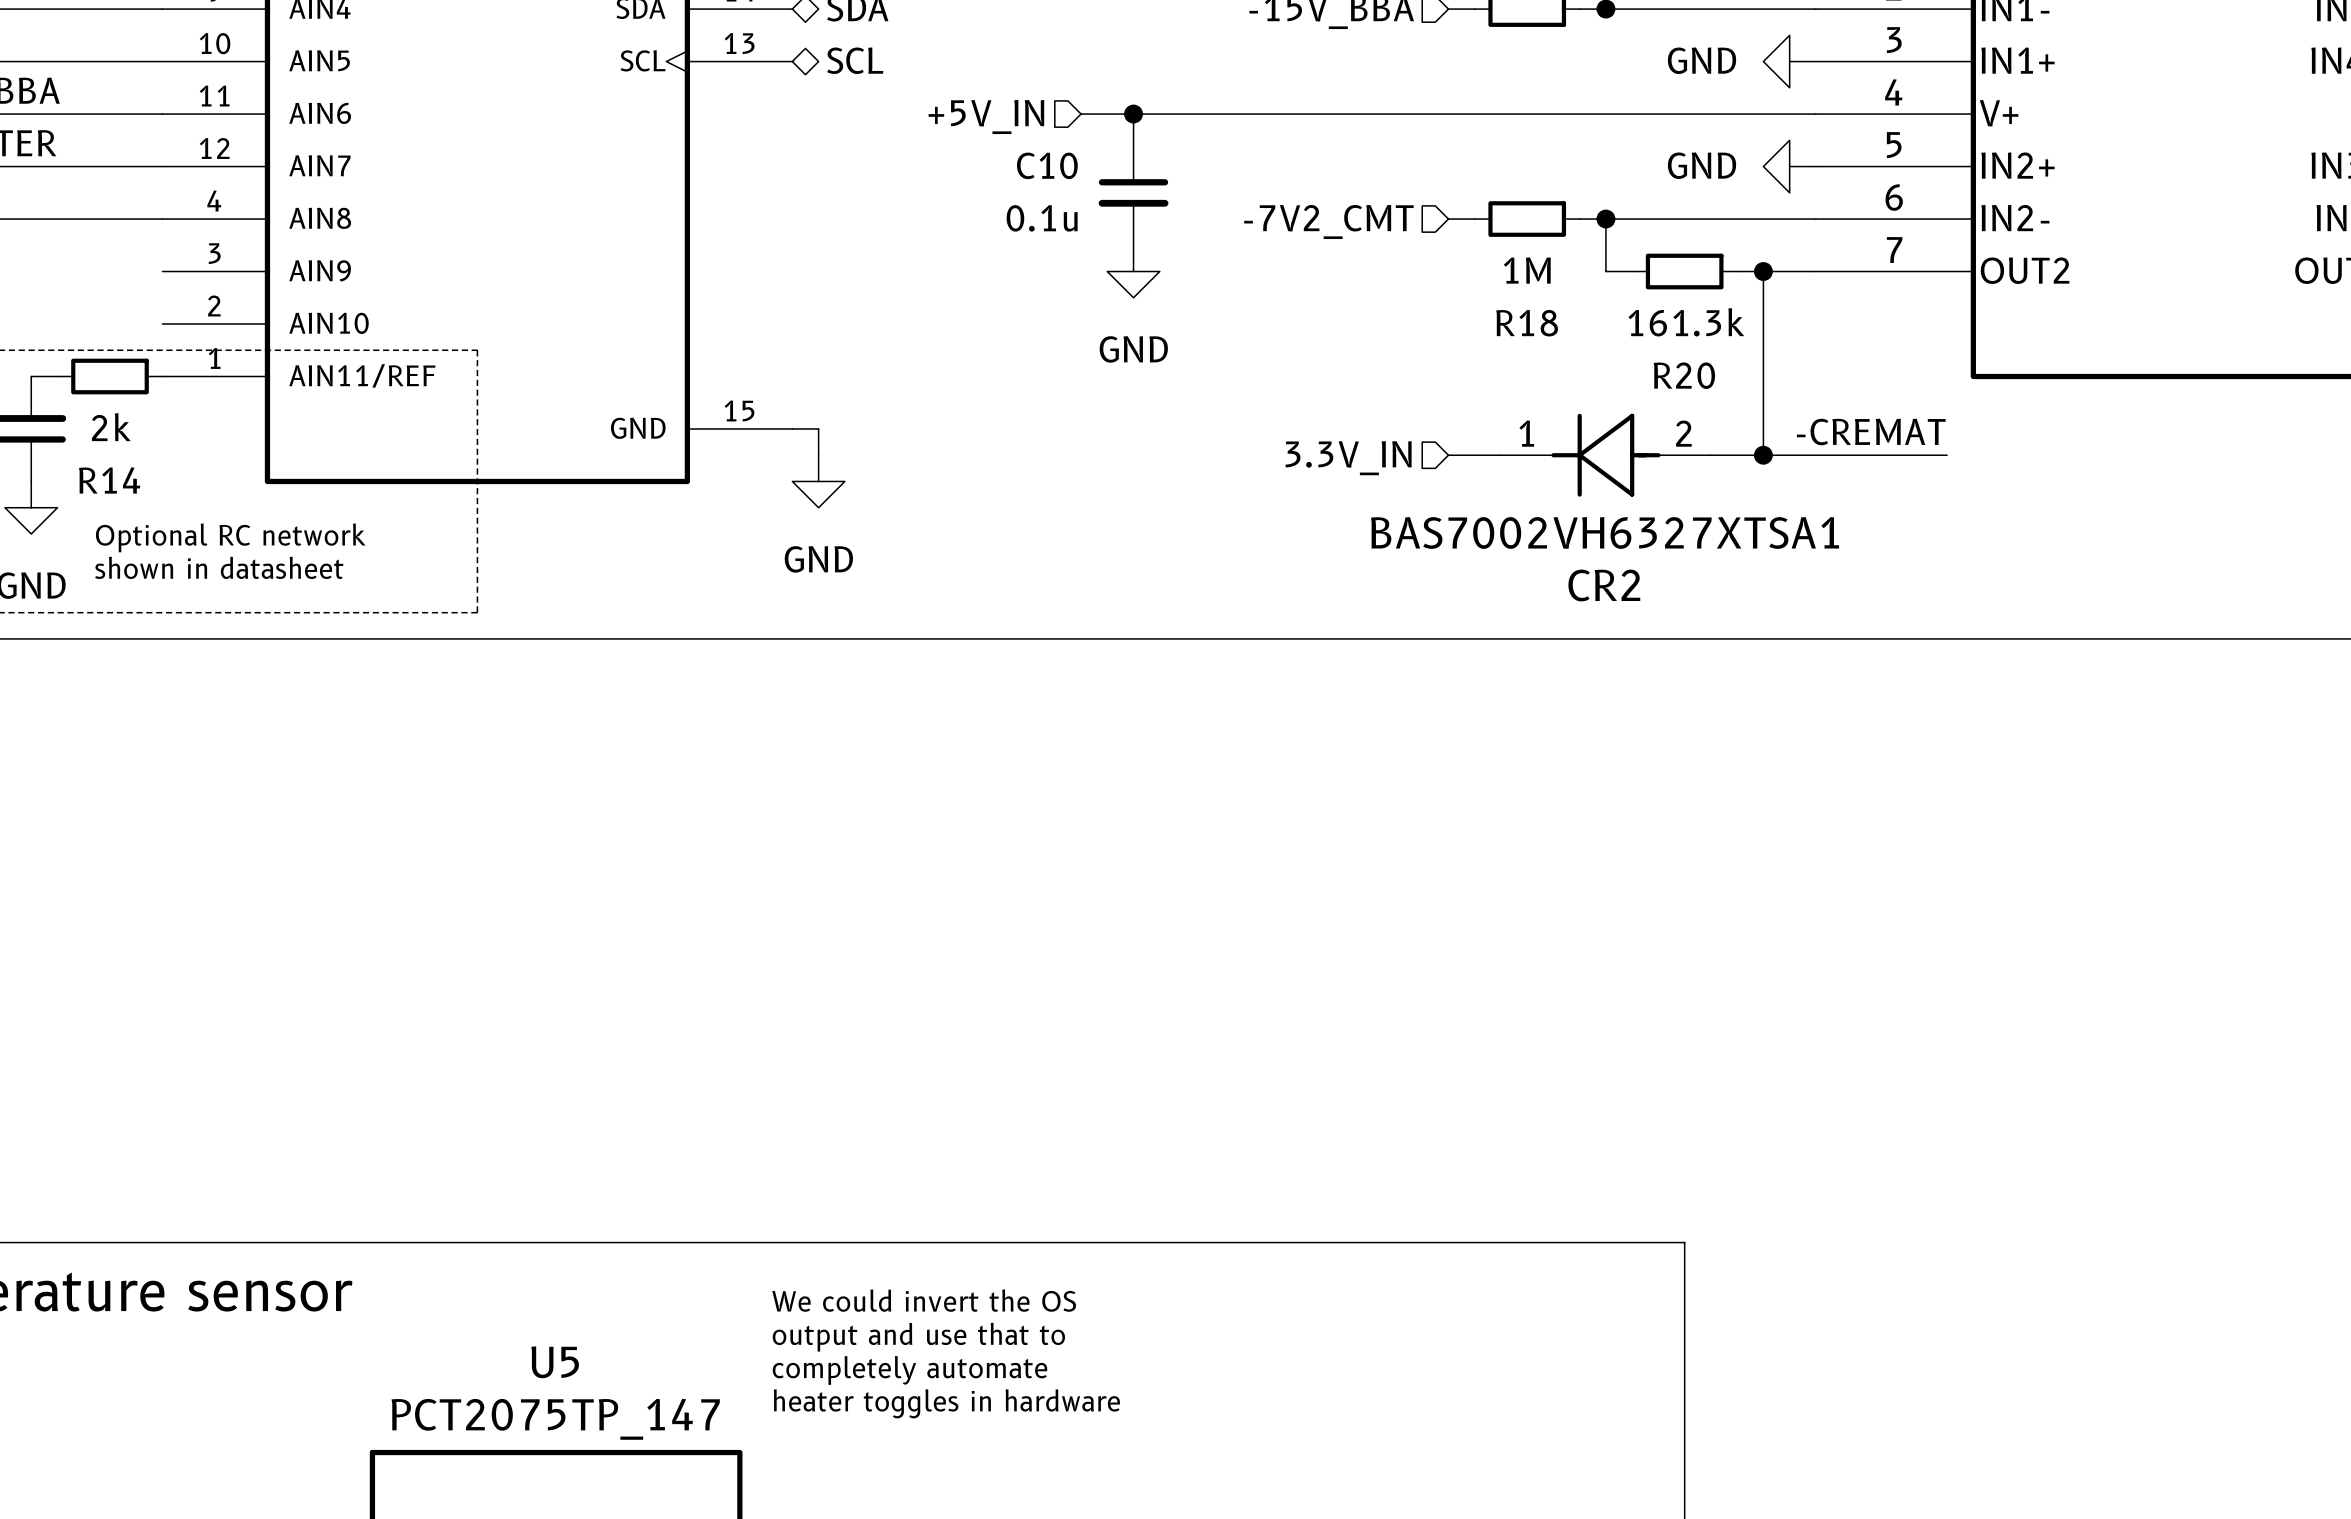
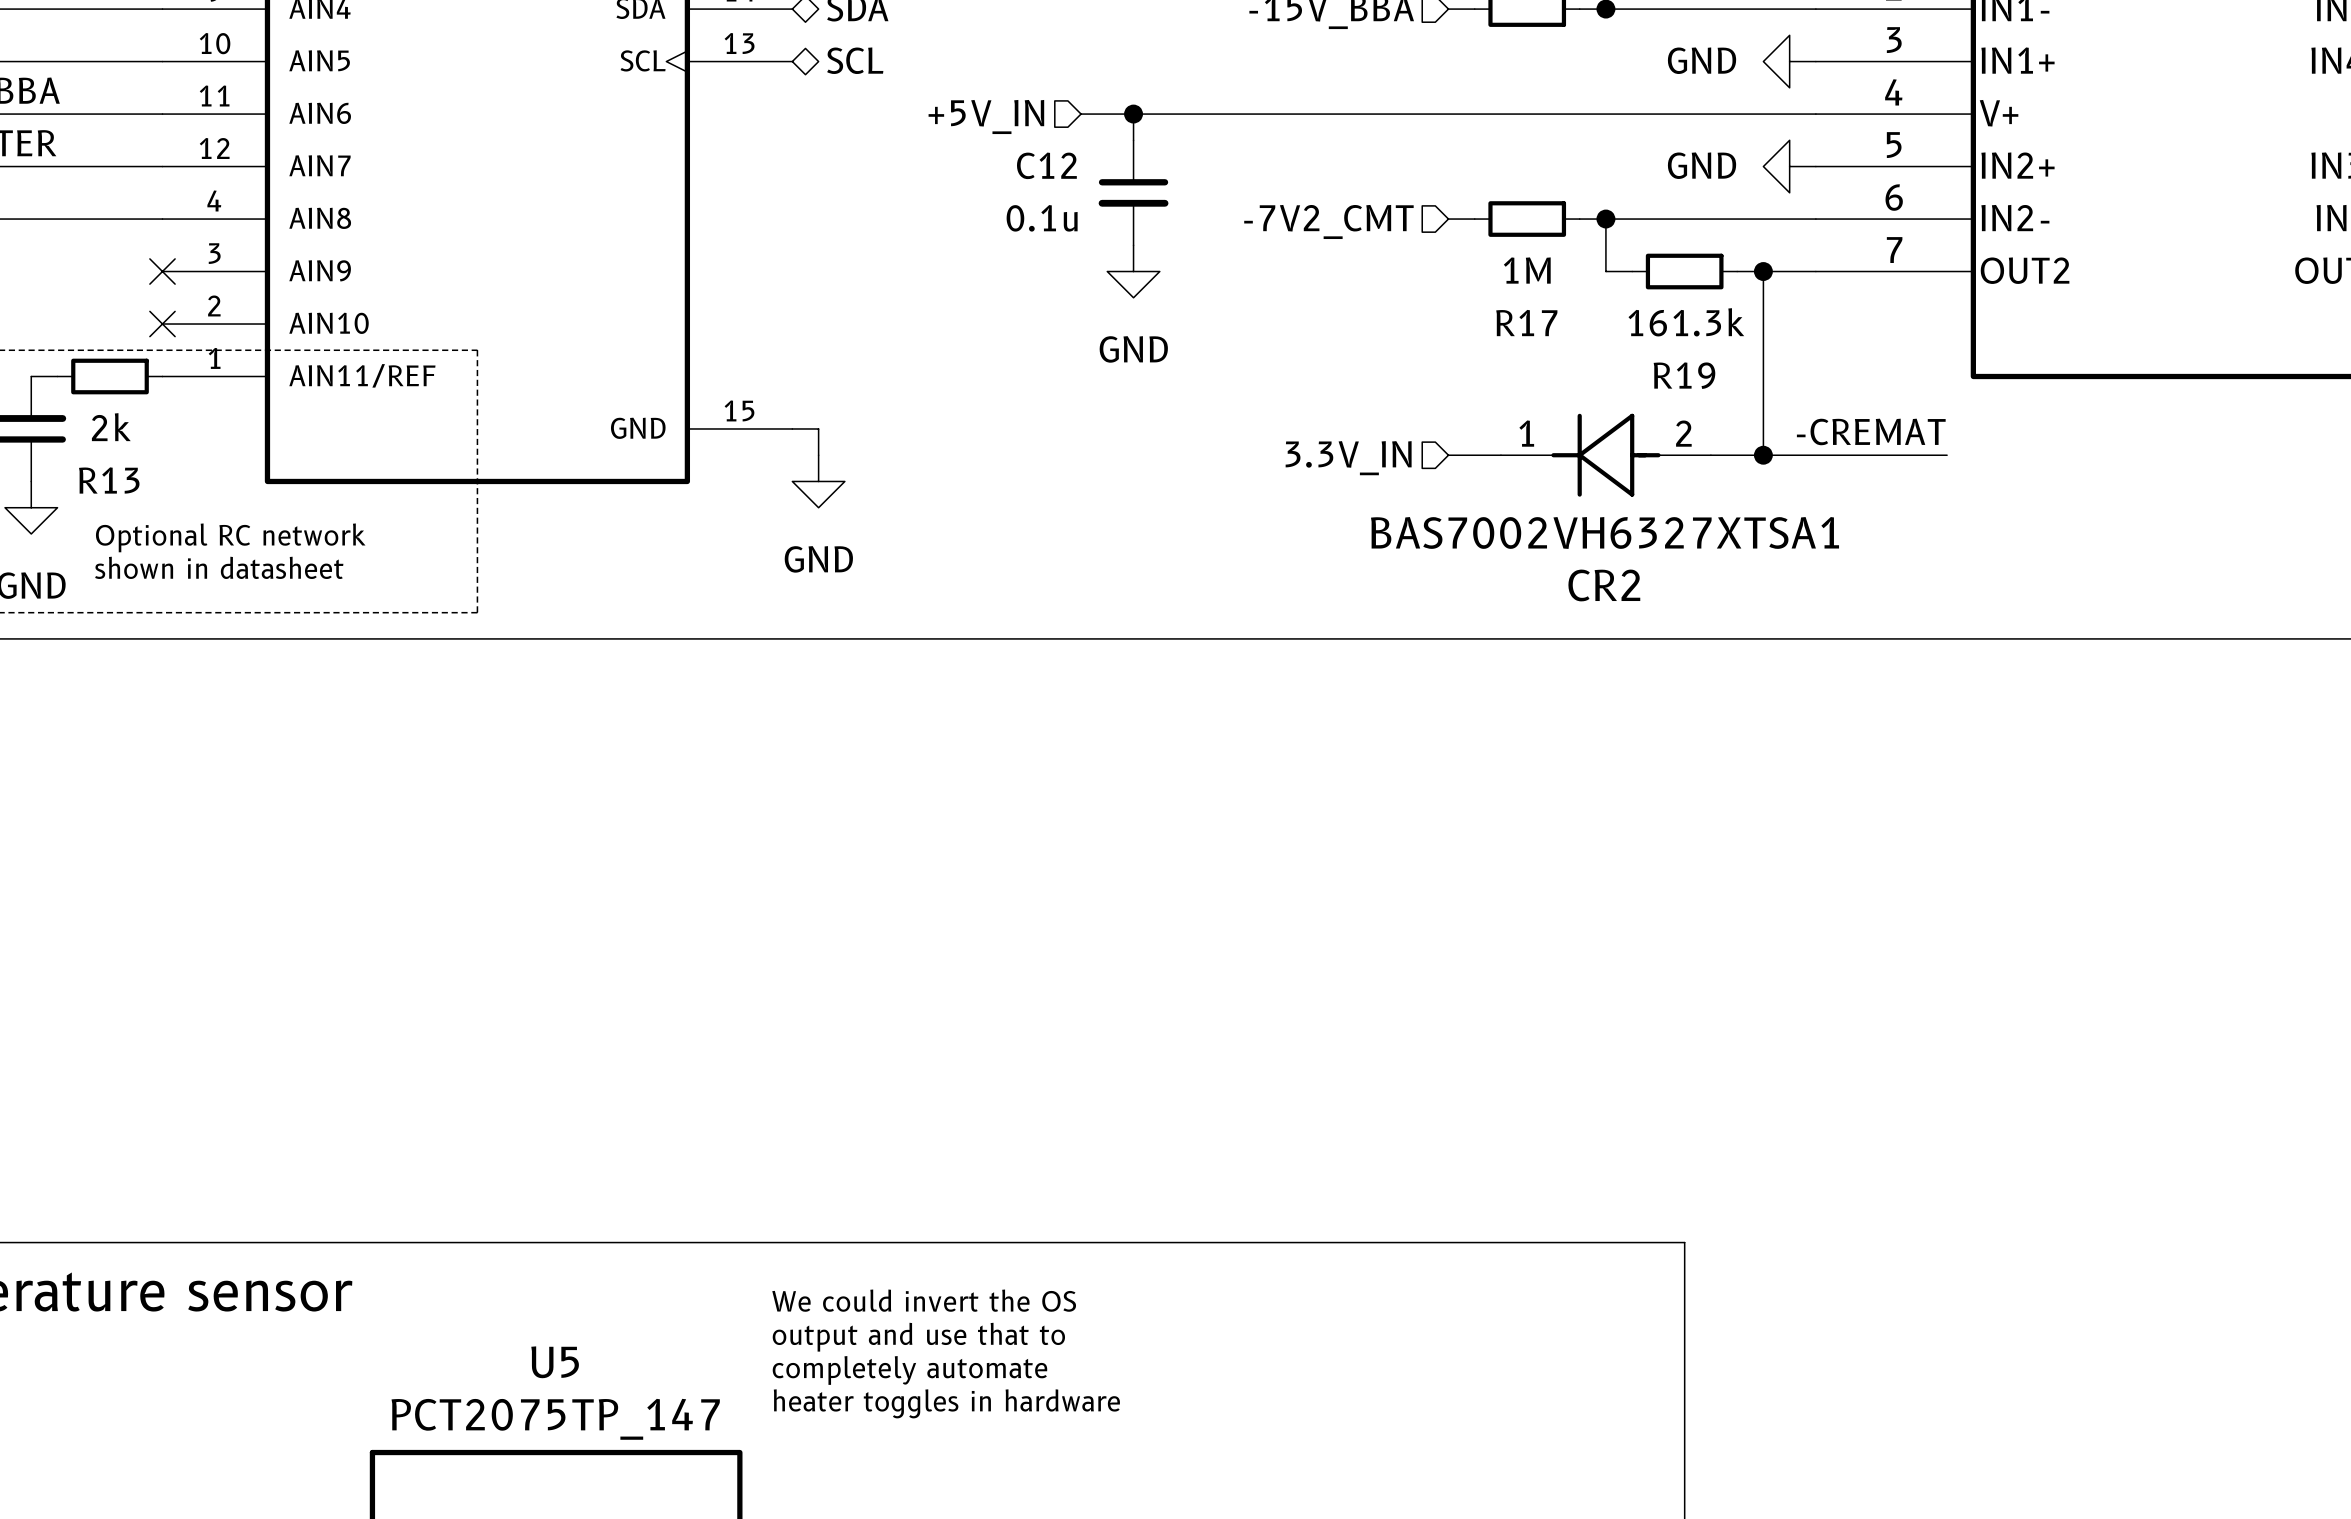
C10 name: C10 (1047, 165) -> C12 (1046, 165)
no-connect mark: none -> (162, 271)
R18 name: R18 (1527, 323) -> R17 (1526, 323)
no-connect mark: none -> (162, 324)
R20 name: R20 (1684, 375) -> R19 (1684, 375)
R14 name: R14 (109, 480) -> R13 (109, 480)

